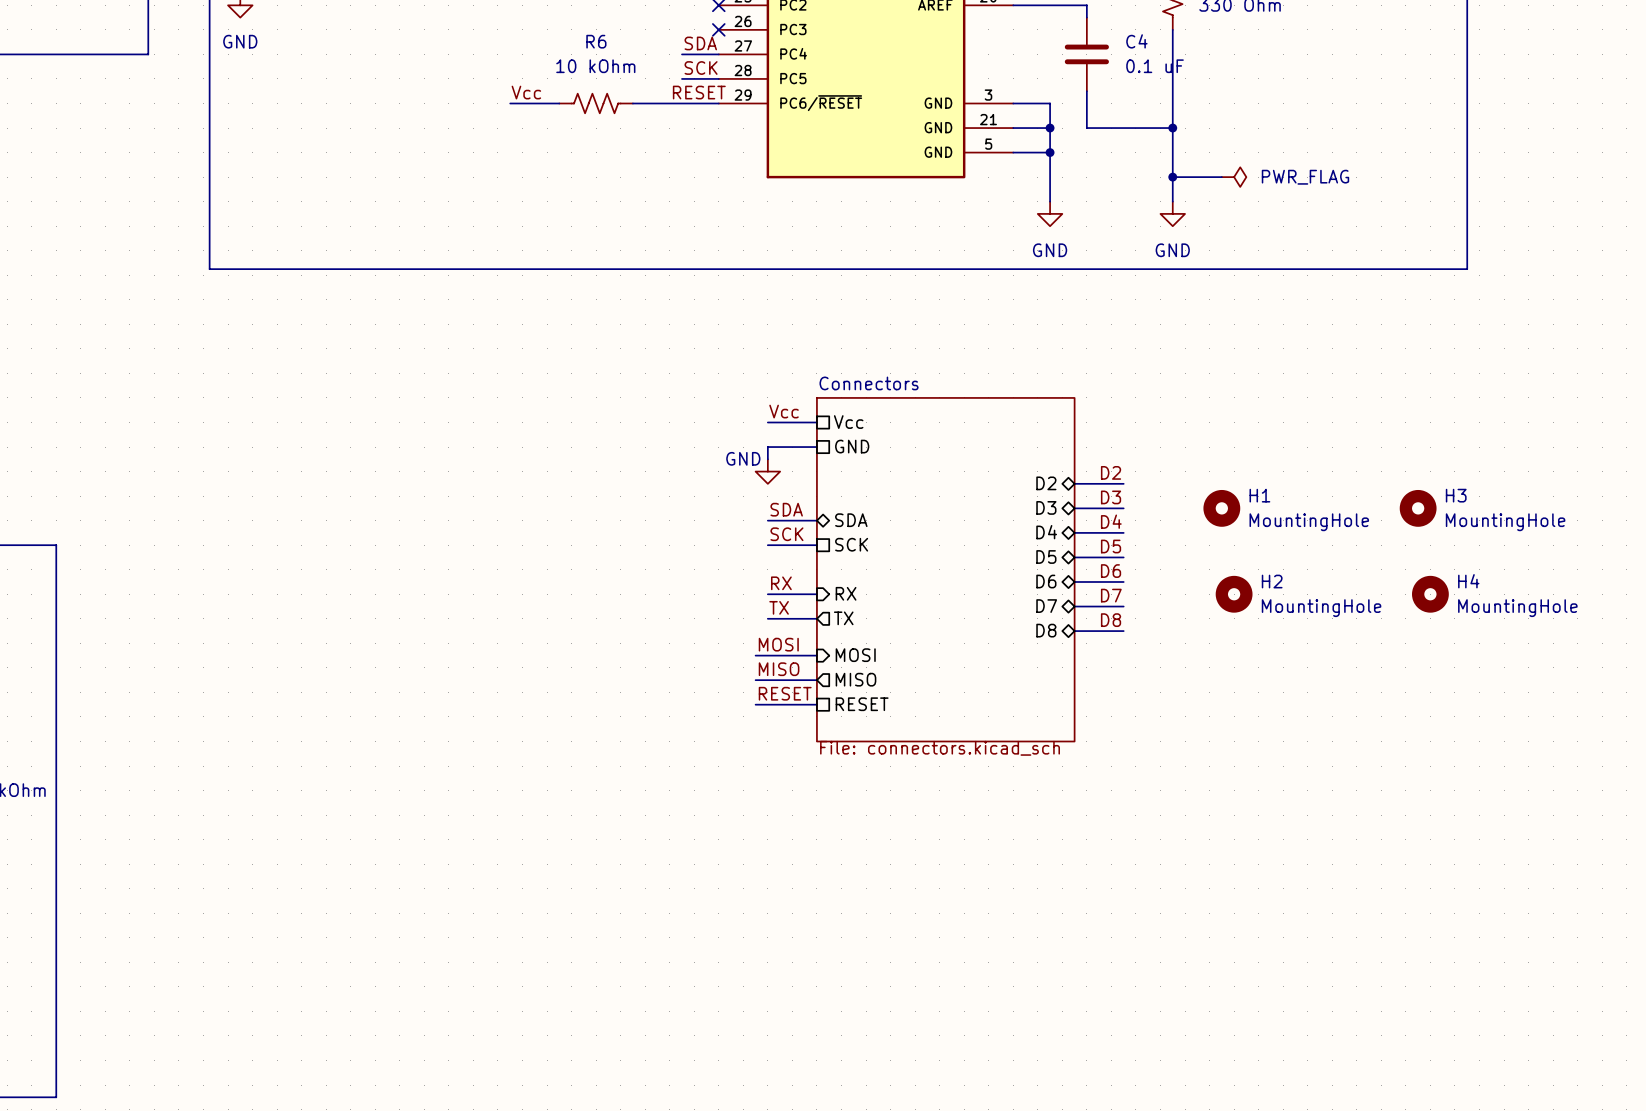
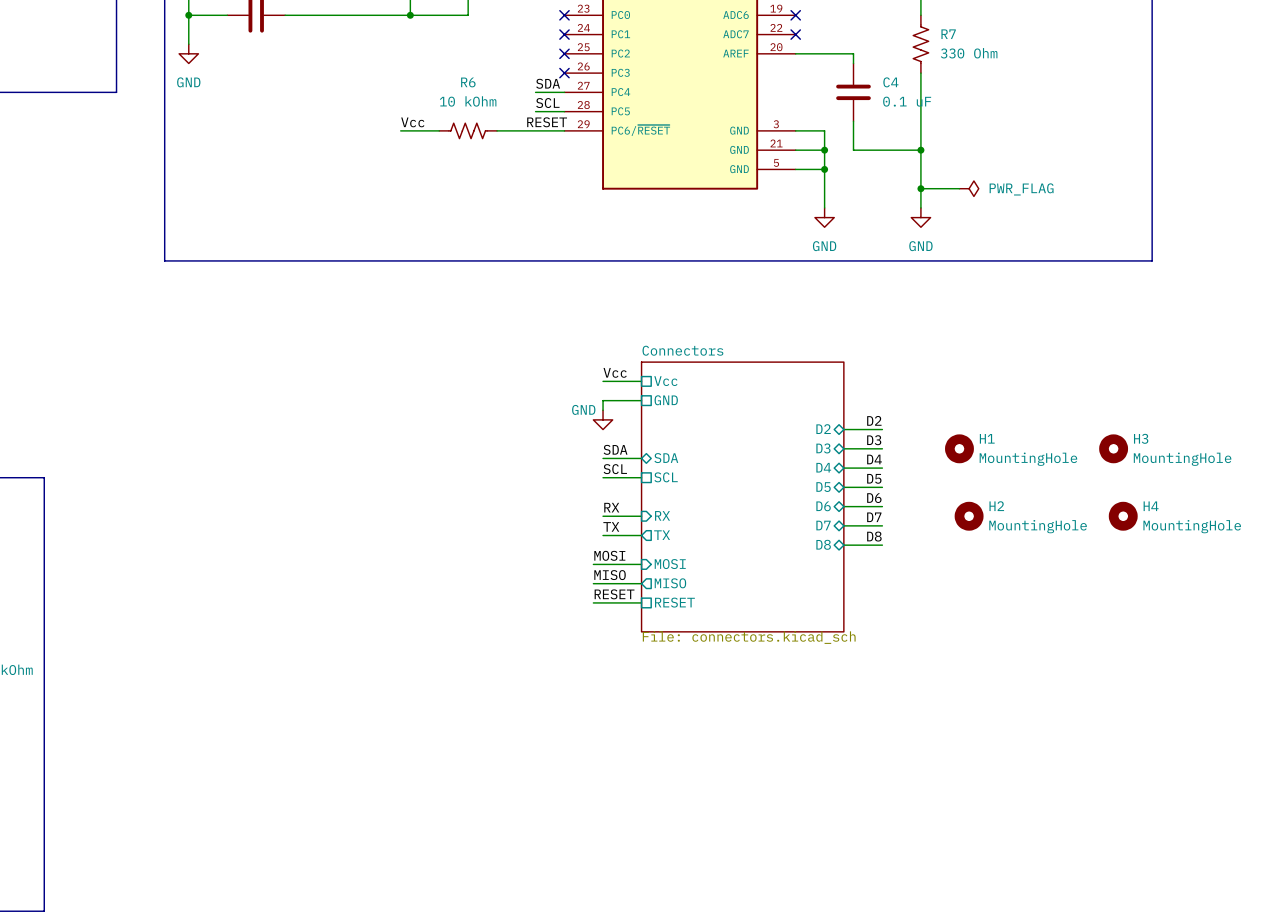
label: SCK (701, 68) -> SCL (547, 103)
label: SCK (786, 534) -> SCL (615, 469)
sheet pin: SCK (851, 544) -> SCL (666, 477)

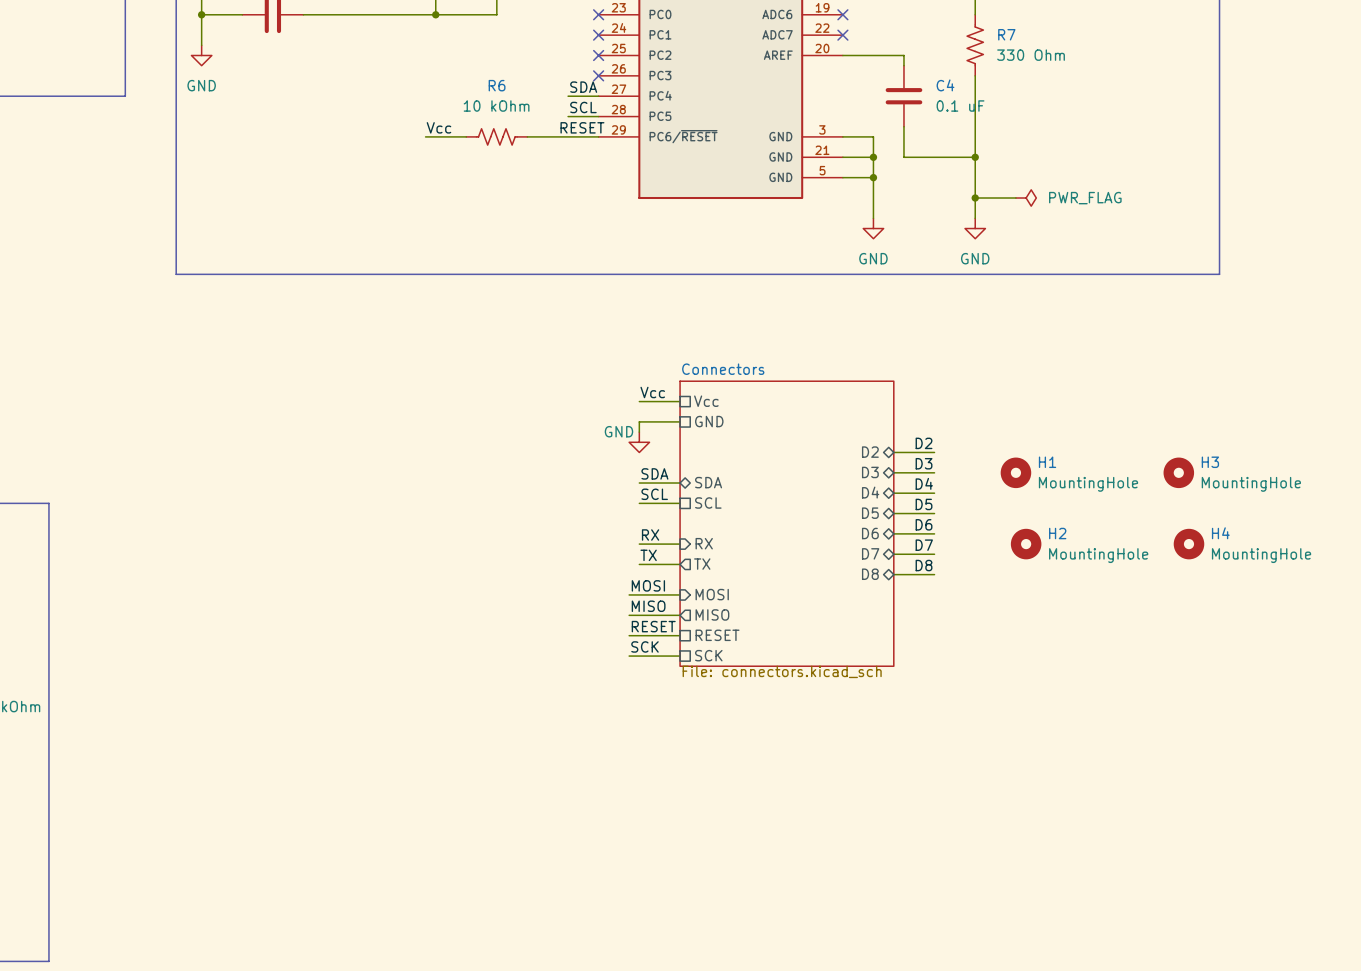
label: none -> SCK (644, 646)
sheet pin: none -> SCK (708, 655)
wire: none -> (629, 656) (680, 656)

